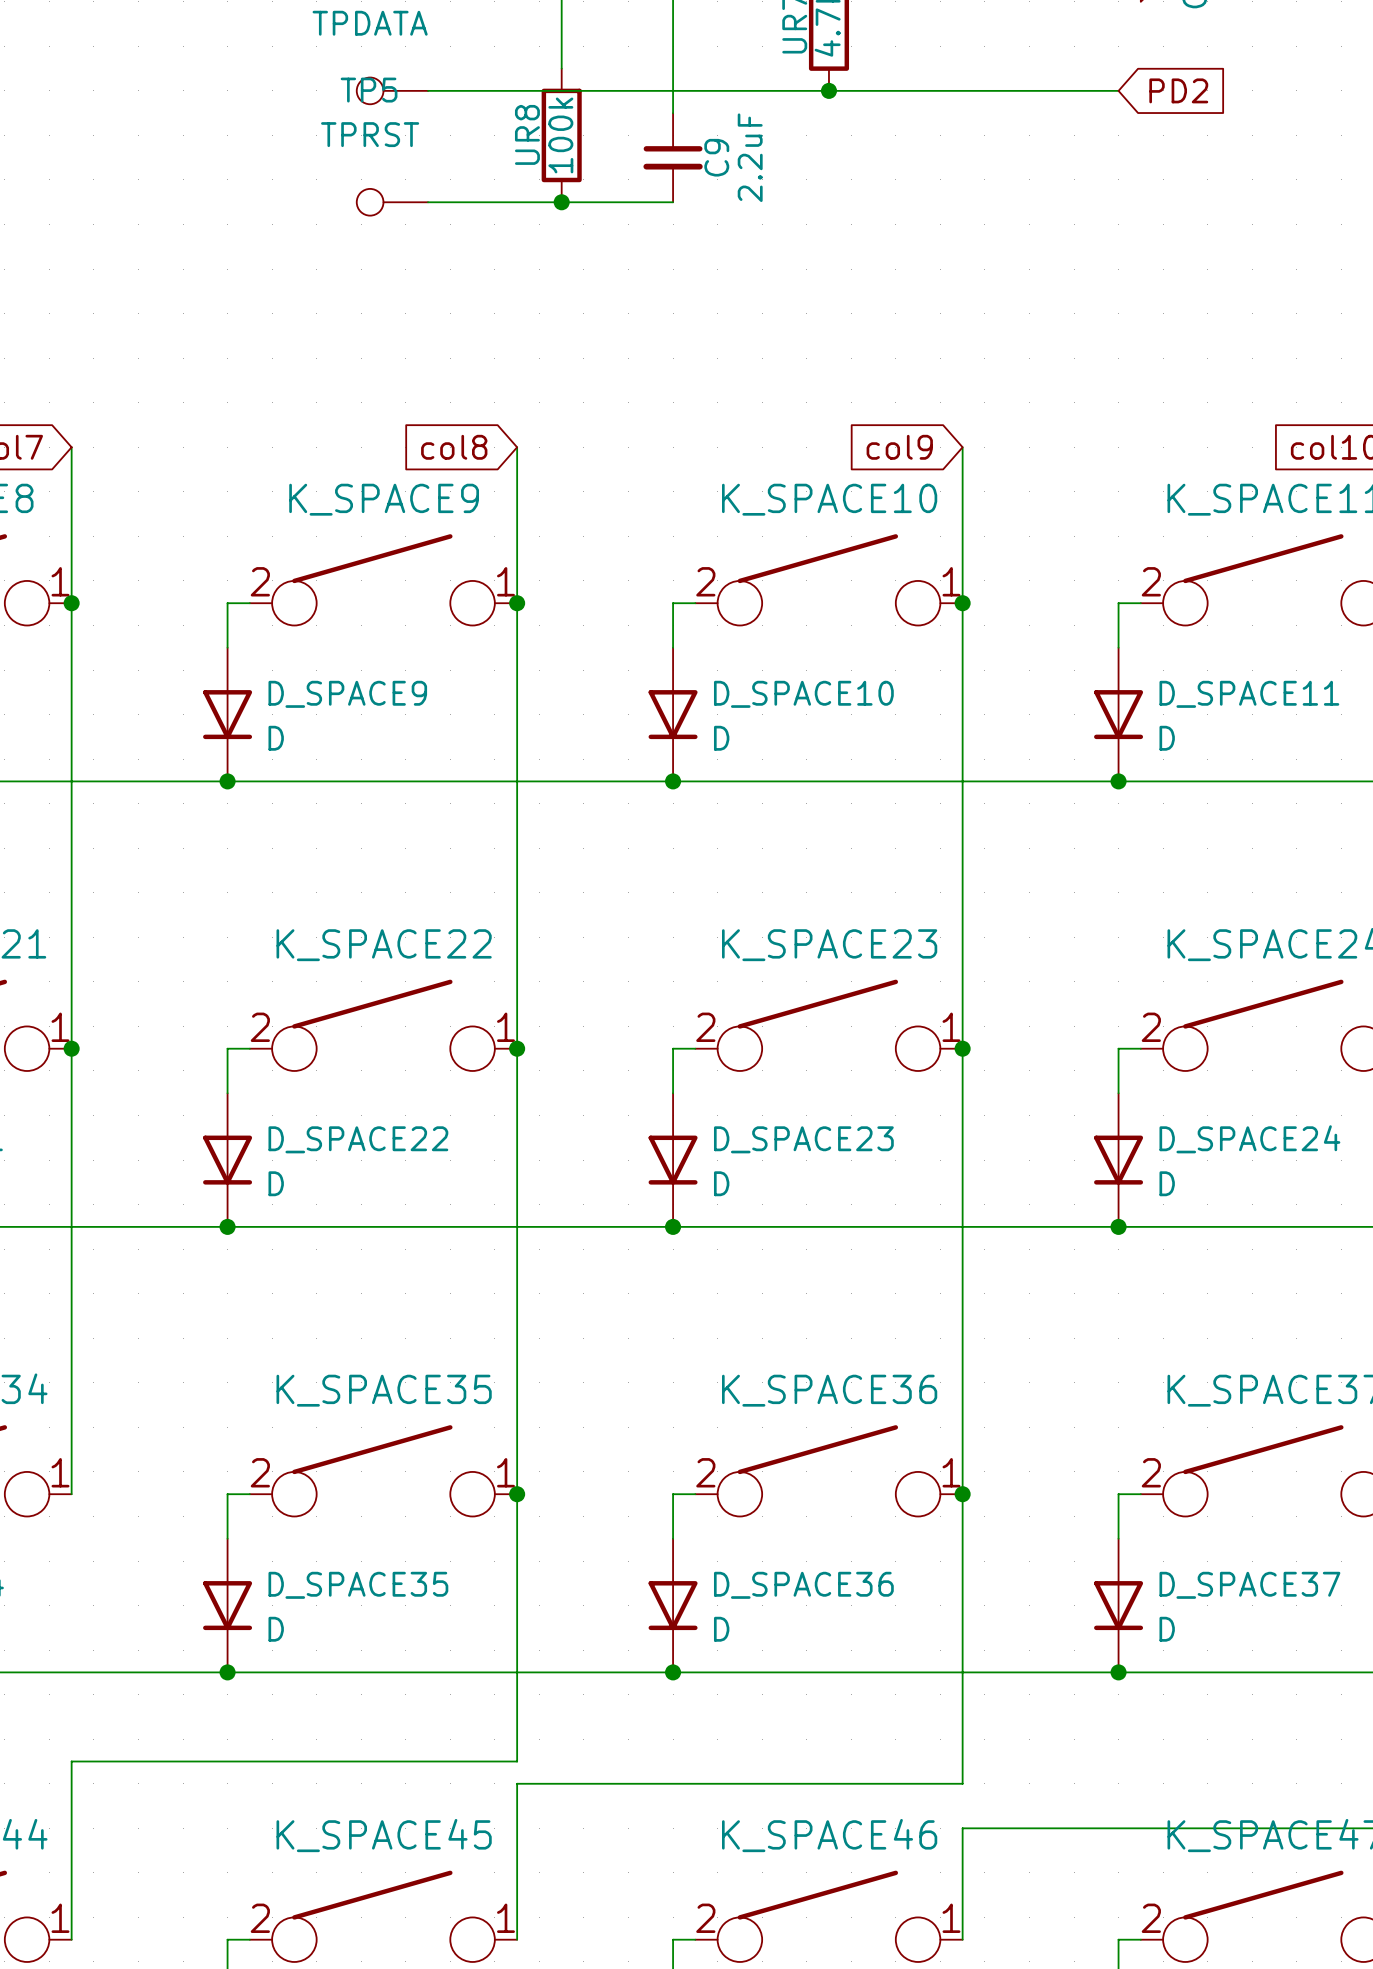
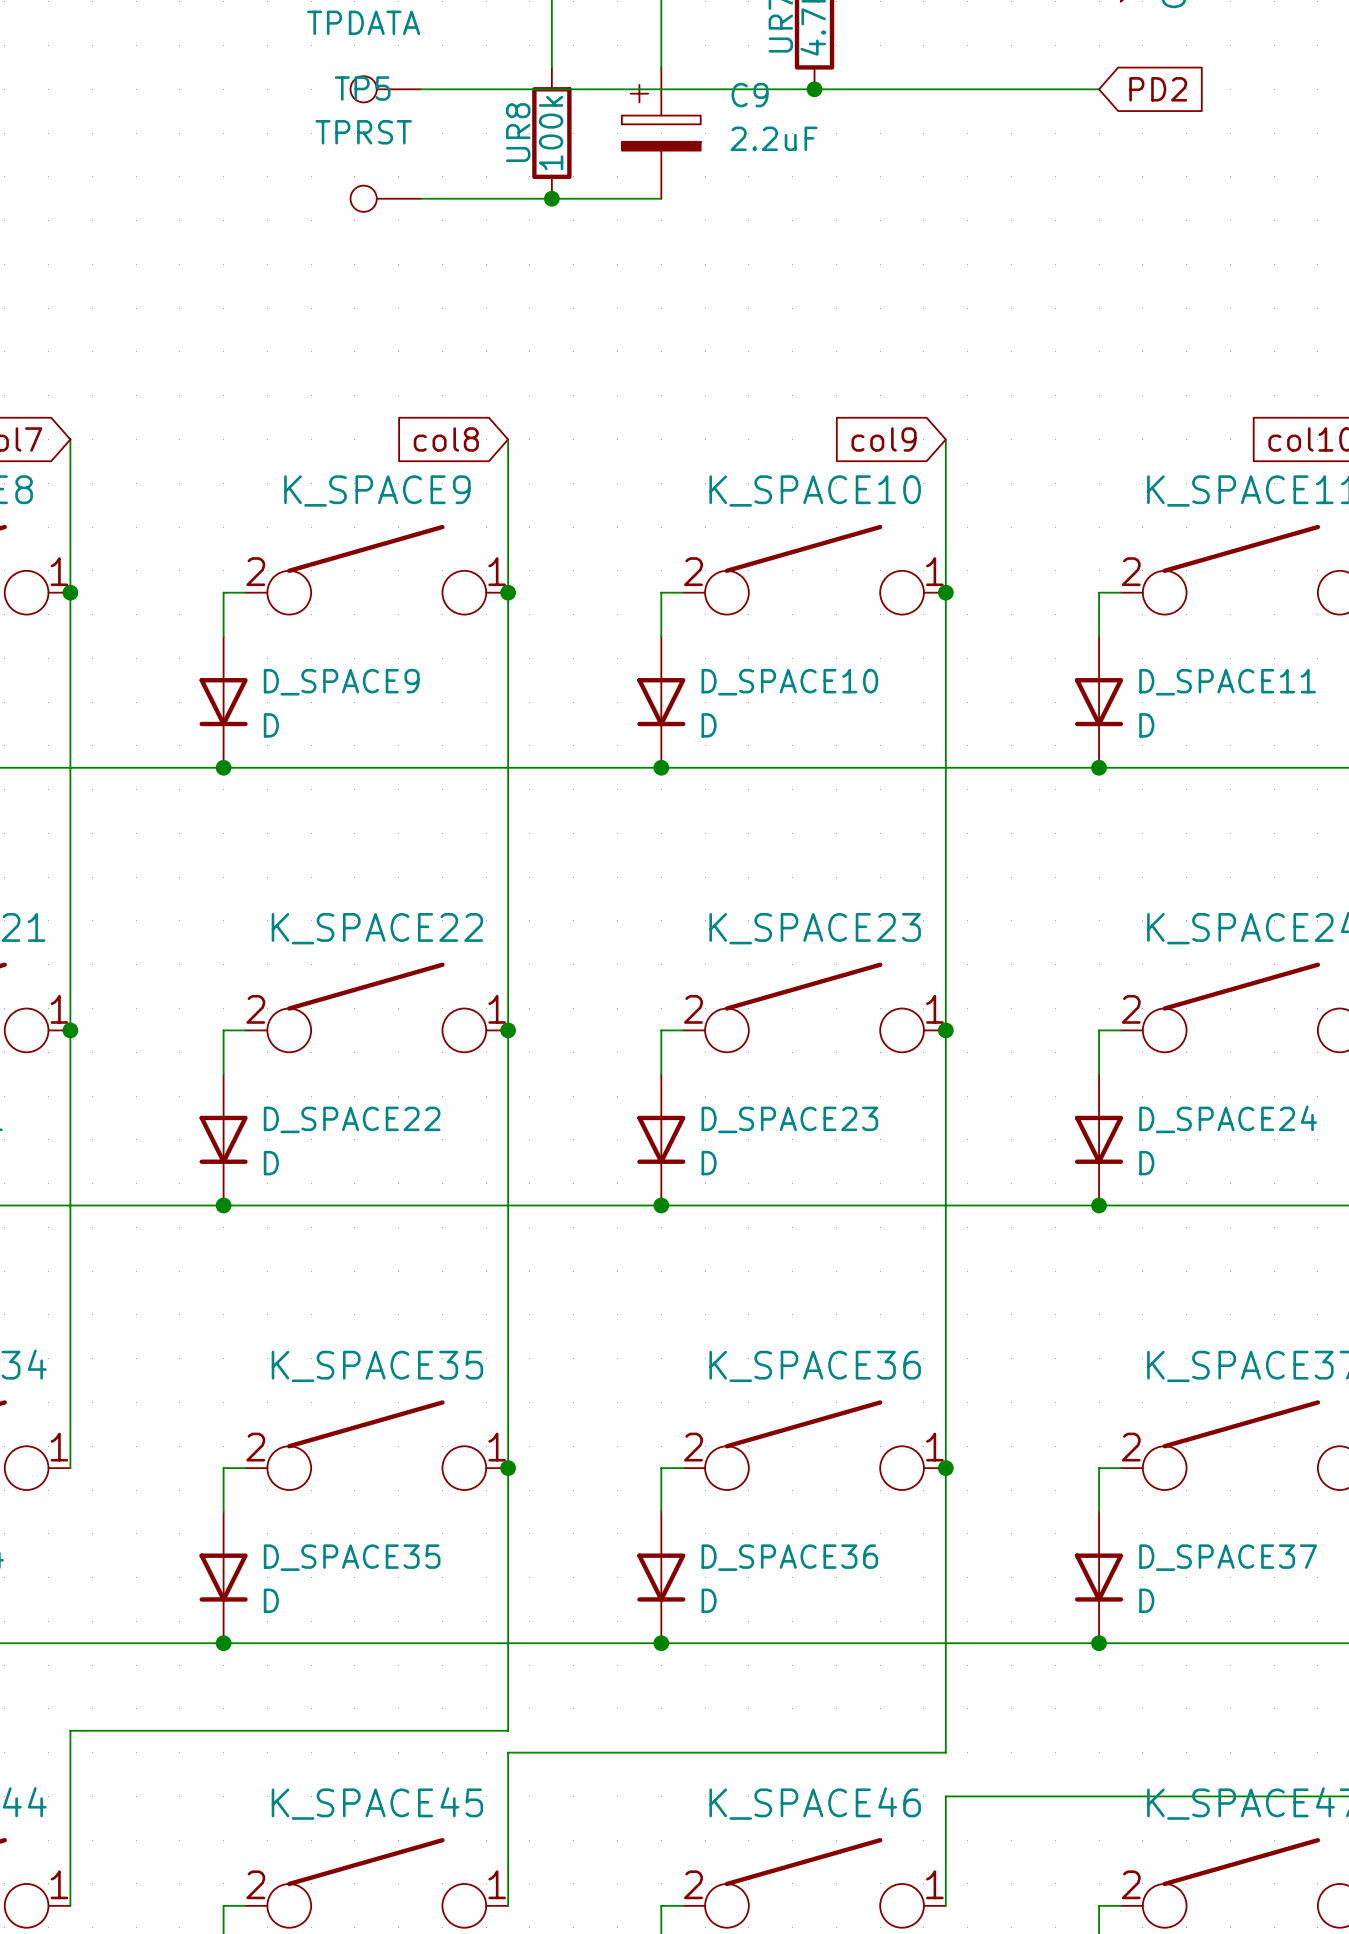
C9 symbol: [643, 113, 703, 203] -> [621, 67, 701, 199]
C9 name position: C9 (716, 157) -> C9 (750, 95)
C9 value position: 2.2uF (750, 157) -> 2.2uF (774, 138)

